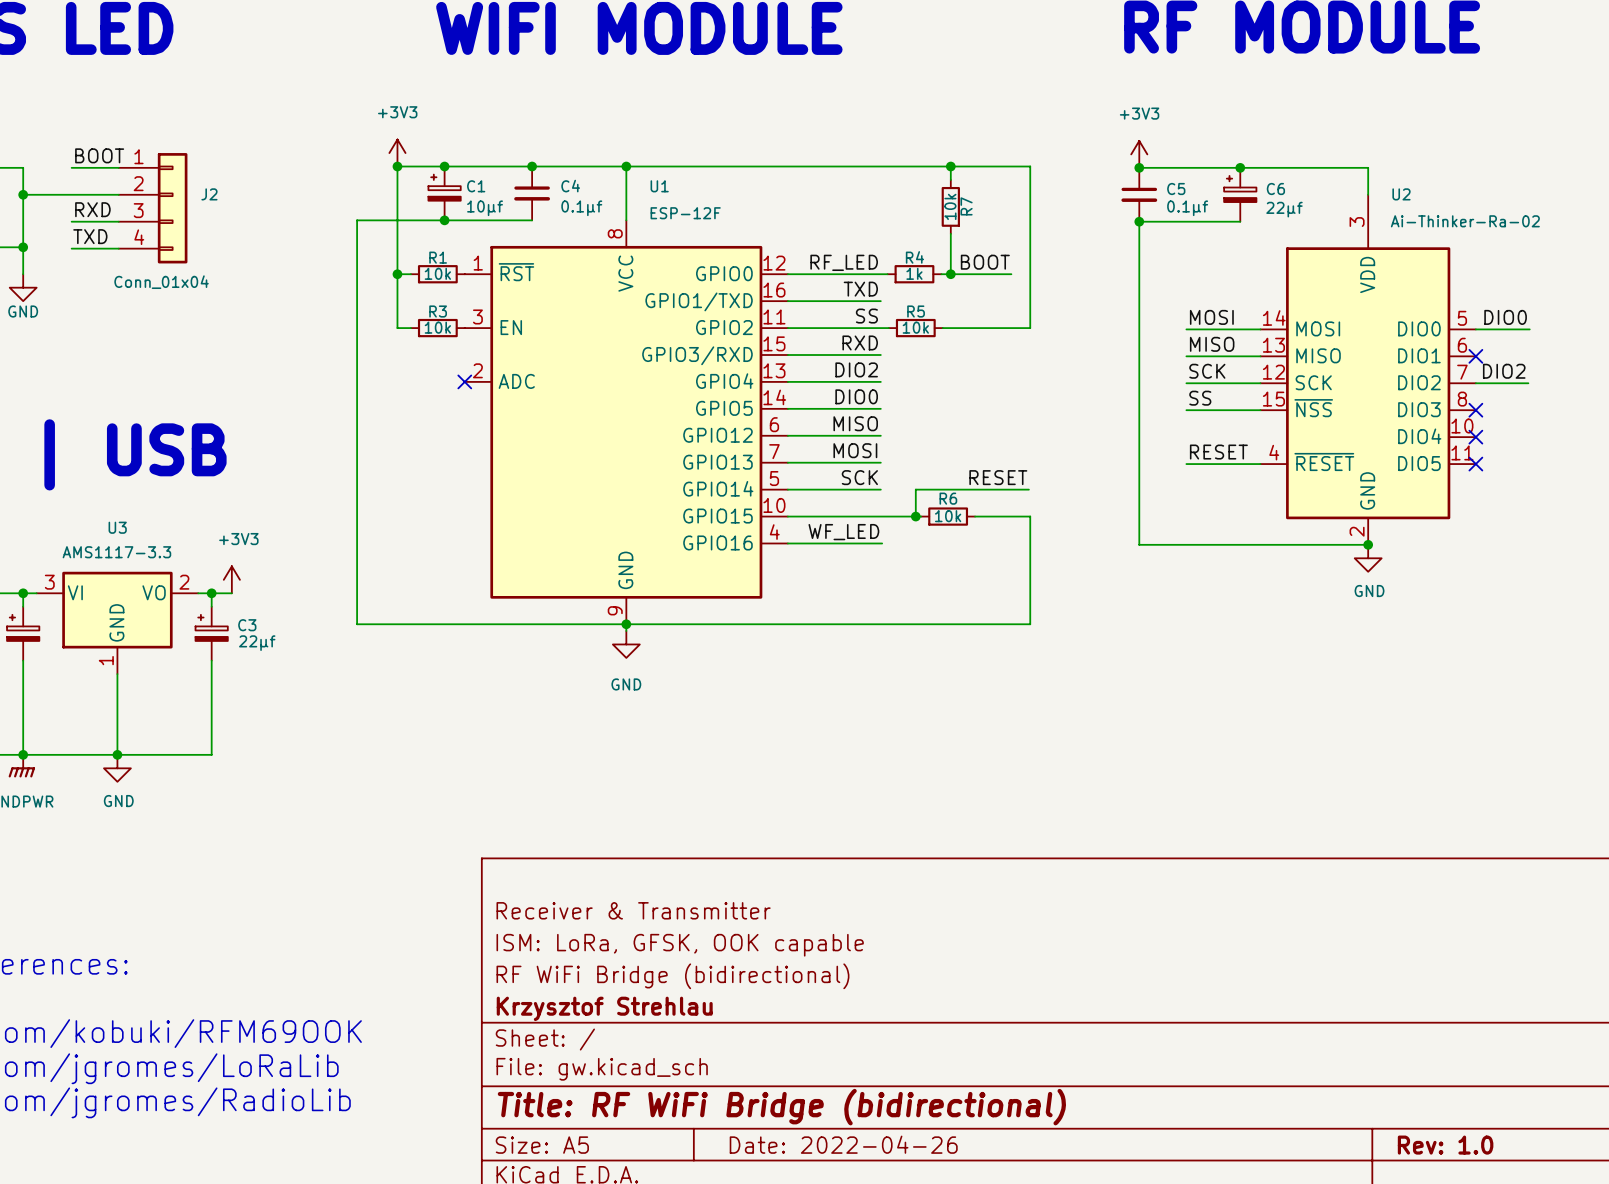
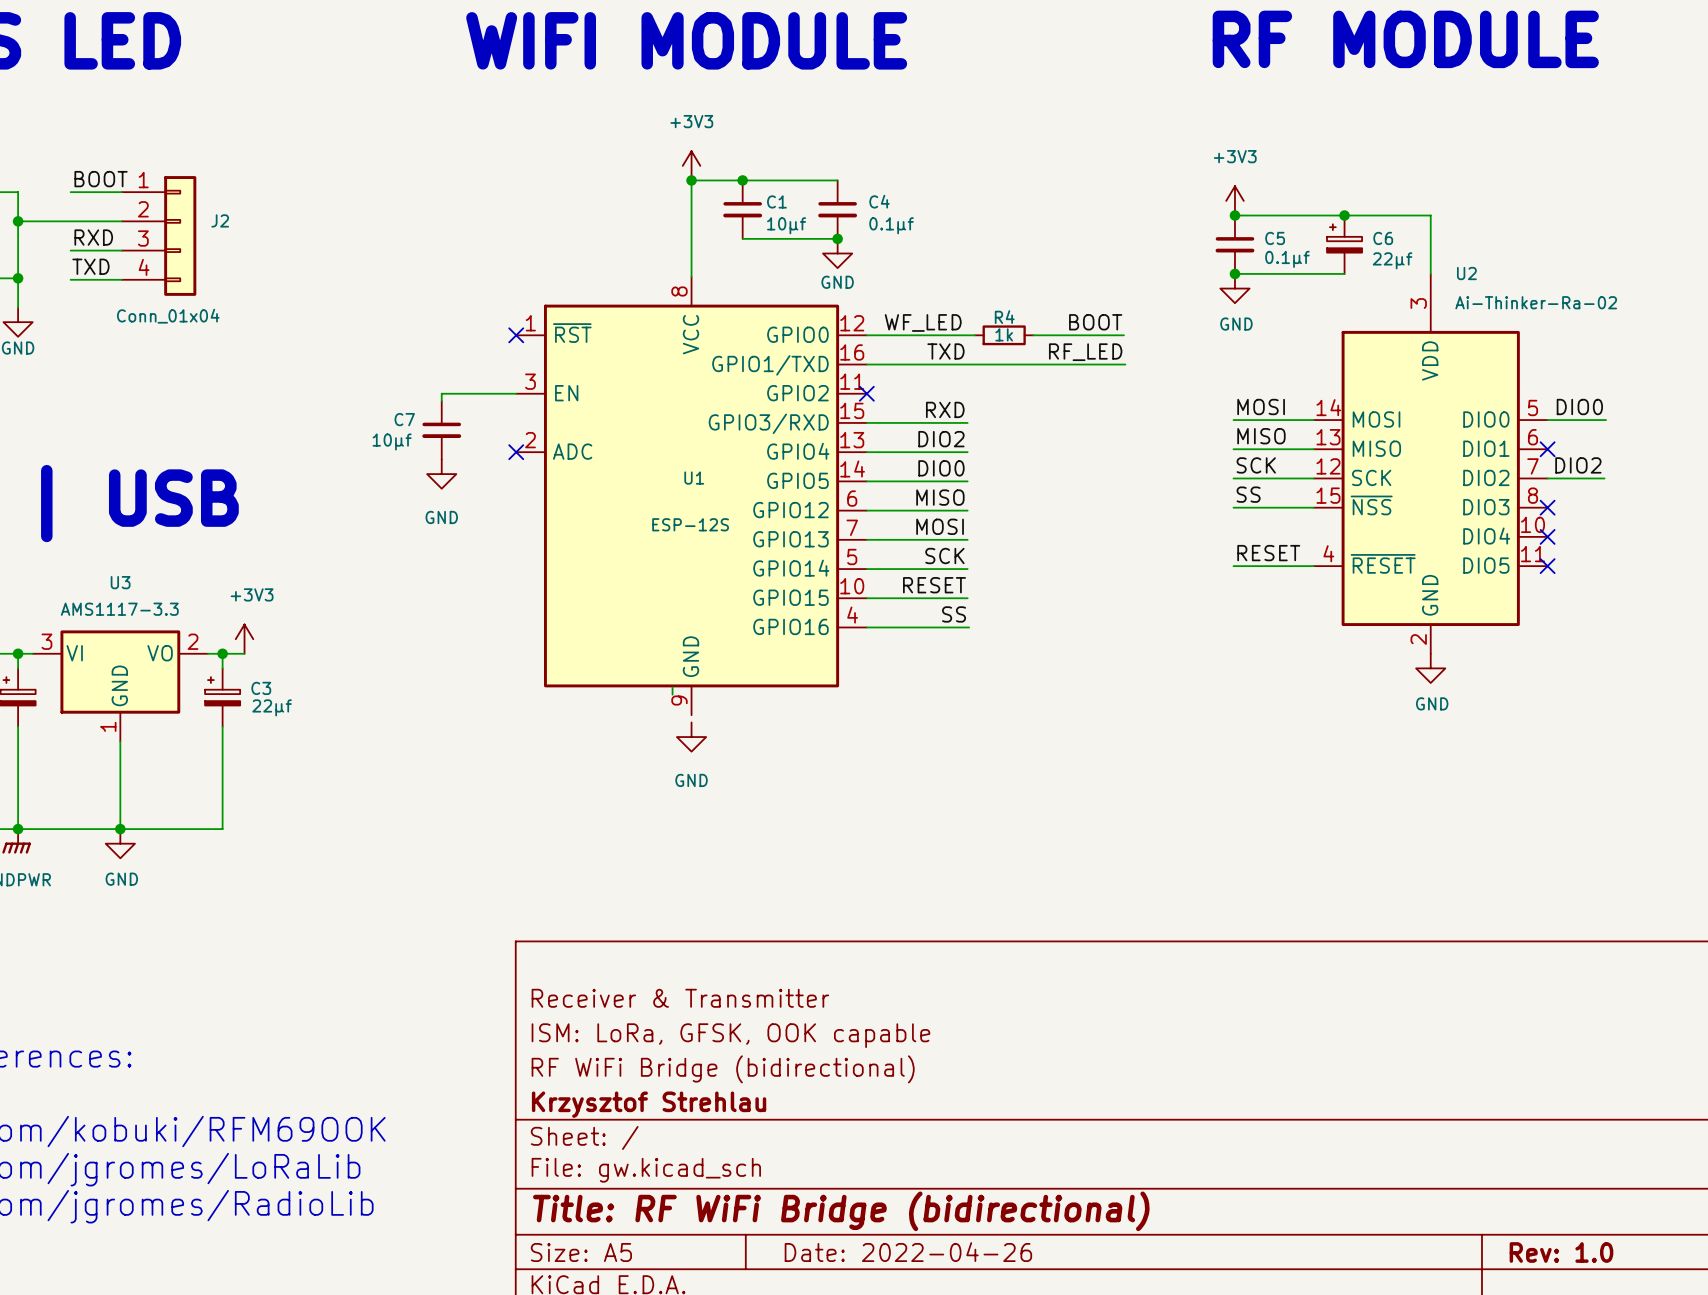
power symbol position: +3V3 (397, 153) -> +3V3 (691, 165)
power symbol position: +3V3 (1139, 154) -> +3V3 (1234, 200)
junction: none -> (742, 180)
wire: none -> (837, 180) (691, 180) (691, 276)
junction: (397, 166) -> none
C1 symbol: [428, 166, 461, 221] -> [723, 180, 763, 239]
junction: (444, 166) -> none
junction: (532, 166) -> none
wire: (626, 166) (626, 220) -> none
junction position: (626, 166) -> (691, 180)
wire: (950, 166) (950, 179) -> none
junction: (950, 166) -> none
wire: (1139, 167) (1368, 167) (1368, 194) -> none
junction: (1139, 167) -> none
junction position: (1240, 167) -> (1344, 215)
U1 name position: U1 (659, 186) -> U1 (694, 478)
wire: none -> (1234, 215) (1430, 215) (1430, 273)
junction: none -> (1234, 215)
C4 position: (532, 193) -> (837, 209)
C5 position: (1139, 194) -> (1234, 244)
C6 position: (1240, 194) -> (1344, 244)
R7: 10k (950, 206) -> none
wire: none -> (742, 238) (837, 238)
junction: none -> (837, 238)
U1 value: ESP-12F (685, 213) -> ESP-12S (690, 524)
junction: (444, 220) -> none
wire: (532, 220) (357, 220) (357, 624) (1030, 624) (1030, 516) (975, 516) -> none
junction: (1139, 221) -> none
wire: (1240, 221) (1139, 221) (1139, 544) (1368, 544) -> none
power symbol: none -> GND (837, 253)
wire: (950, 233) (950, 274) -> none
wire: none -> (1234, 273) (1344, 273)
junction: none -> (1234, 273)
power symbol: none -> GND (1234, 288)
label position: RF_LED (844, 262) -> RF_LED (1085, 352)
label position: BOOT (985, 262) -> BOOT (1095, 322)
wire: (397, 274) (410, 274) -> none
junction: (397, 274) -> none
R1: 10k (437, 274) -> none
wire: (787, 274) (887, 274) -> (866, 335) (974, 335)
R4 position: (914, 274) -> (1004, 335)
wire: (941, 274) (1011, 274) -> none
junction: (950, 274) -> none
label position: TXD (860, 289) -> TXD (945, 351)
no-connect mark: none -> (516, 335)
wire: none -> (1033, 335) (1123, 335)
wire: (787, 301) (880, 301) -> (866, 598) (967, 598)
label: SS (866, 316) -> none
label position: MOSI (1211, 317) -> MOSI (1261, 407)
label position: DIO0 (1505, 317) -> DIO0 (1579, 407)
wire: none -> (866, 364) (1125, 364)
wire: (410, 328) (397, 328) (397, 166) (1030, 166) (1030, 328) (942, 328) -> none
R3: 10k (437, 328) -> none
wire: (787, 328) (888, 328) -> none
R5: 10k (915, 328) -> none
wire: (1186, 329) (1260, 329) -> (1233, 420) (1313, 420)
wire: (1475, 329) (1529, 329) -> (1547, 420) (1606, 420)
label position: RXD (860, 342) -> RXD (945, 409)
label position: MISO (1212, 344) -> MISO (1261, 436)
wire: none -> (516, 393) (441, 393) (441, 401)
no-connect mark: none -> (866, 393)
wire: (787, 355) (880, 355) -> (866, 422) (967, 422)
wire: (1186, 356) (1260, 356) -> (1233, 449) (1313, 449)
no-connect mark: (1475, 356) -> none
label position: DIO2 (856, 369) -> DIO2 (941, 439)
U2 position: (1368, 369) -> (1430, 463)
label position: SCK (1207, 371) -> SCK (1256, 465)
label position: DIO2 (1504, 371) -> DIO2 (1578, 465)
no-connect mark position: (464, 381) -> (516, 452)
wire: (787, 381) (880, 381) -> (866, 452) (967, 452)
wire: (1186, 383) (1260, 383) -> (1233, 478) (1313, 478)
wire: (1475, 383) (1528, 383) -> (1547, 478) (1604, 478)
C7: none -> 10µf (441, 430)
label position: DIO0 (856, 396) -> DIO0 (941, 468)
label position: SS (1200, 398) -> SS (1248, 494)
no-connect mark: none -> (1547, 449)
wire: (787, 408) (880, 408) -> (866, 481) (967, 481)
wire: (1186, 410) (1260, 410) -> (1233, 507) (1313, 507)
no-connect mark: (1475, 410) -> none
U1 position: (626, 422) -> (691, 496)
label position: MISO (855, 423) -> MISO (940, 497)
power symbol: none -> GND (441, 474)
wire: (787, 435) (880, 435) -> (866, 510) (967, 510)
no-connect mark: (1475, 437) -> none
label position: MOSI (855, 450) -> MOSI (940, 526)
label: RESET (1218, 452) -> none
no-connect mark: none -> (1547, 507)
wire: (787, 462) (880, 462) -> (866, 539) (967, 539)
wire: (1186, 464) (1260, 464) -> (1233, 566) (1313, 566)
no-connect mark: (1475, 464) -> none
label position: SCK (859, 477) -> SCK (944, 556)
label: RESET (998, 477) -> none
no-connect mark: none -> (1547, 536)
wire: (787, 489) (880, 489) -> (866, 569) (967, 569)
wire: (1028, 489) (915, 489) (915, 516) -> none
label: none -> RESET (1268, 553)
no-connect mark: none -> (1547, 566)
wire: (787, 516) (921, 516) -> none
junction: (915, 516) -> none
R6: 10k (948, 516) -> none
label: none -> RESET (934, 585)
label position: WF_LED (843, 532) -> WF_LED (923, 322)
wire: (787, 543) (882, 543) -> (866, 627) (969, 627)
junction: (1368, 544) -> none
label: none -> SS (954, 614)
power symbol position: GND (1368, 558) -> GND (1430, 668)
junction: (626, 624) -> none
power symbol position: GND (626, 644) -> GND (691, 737)

